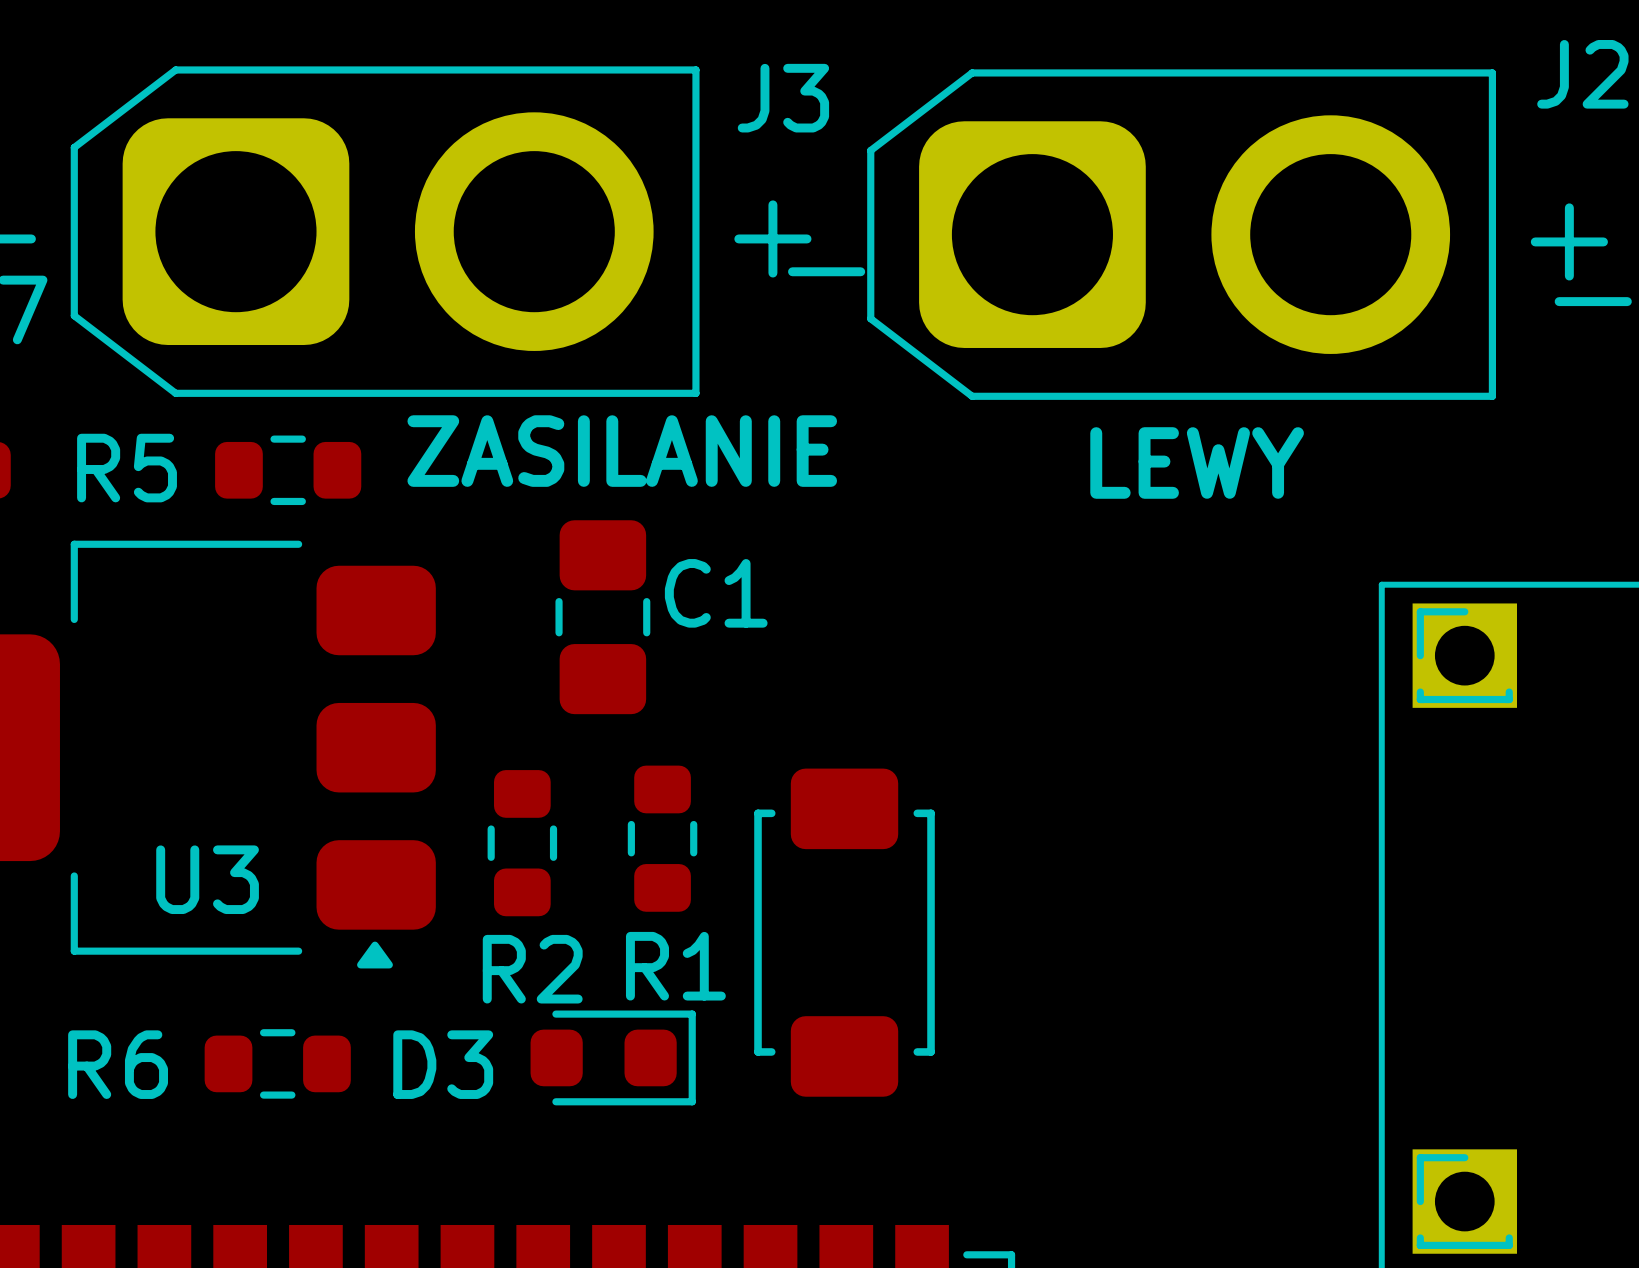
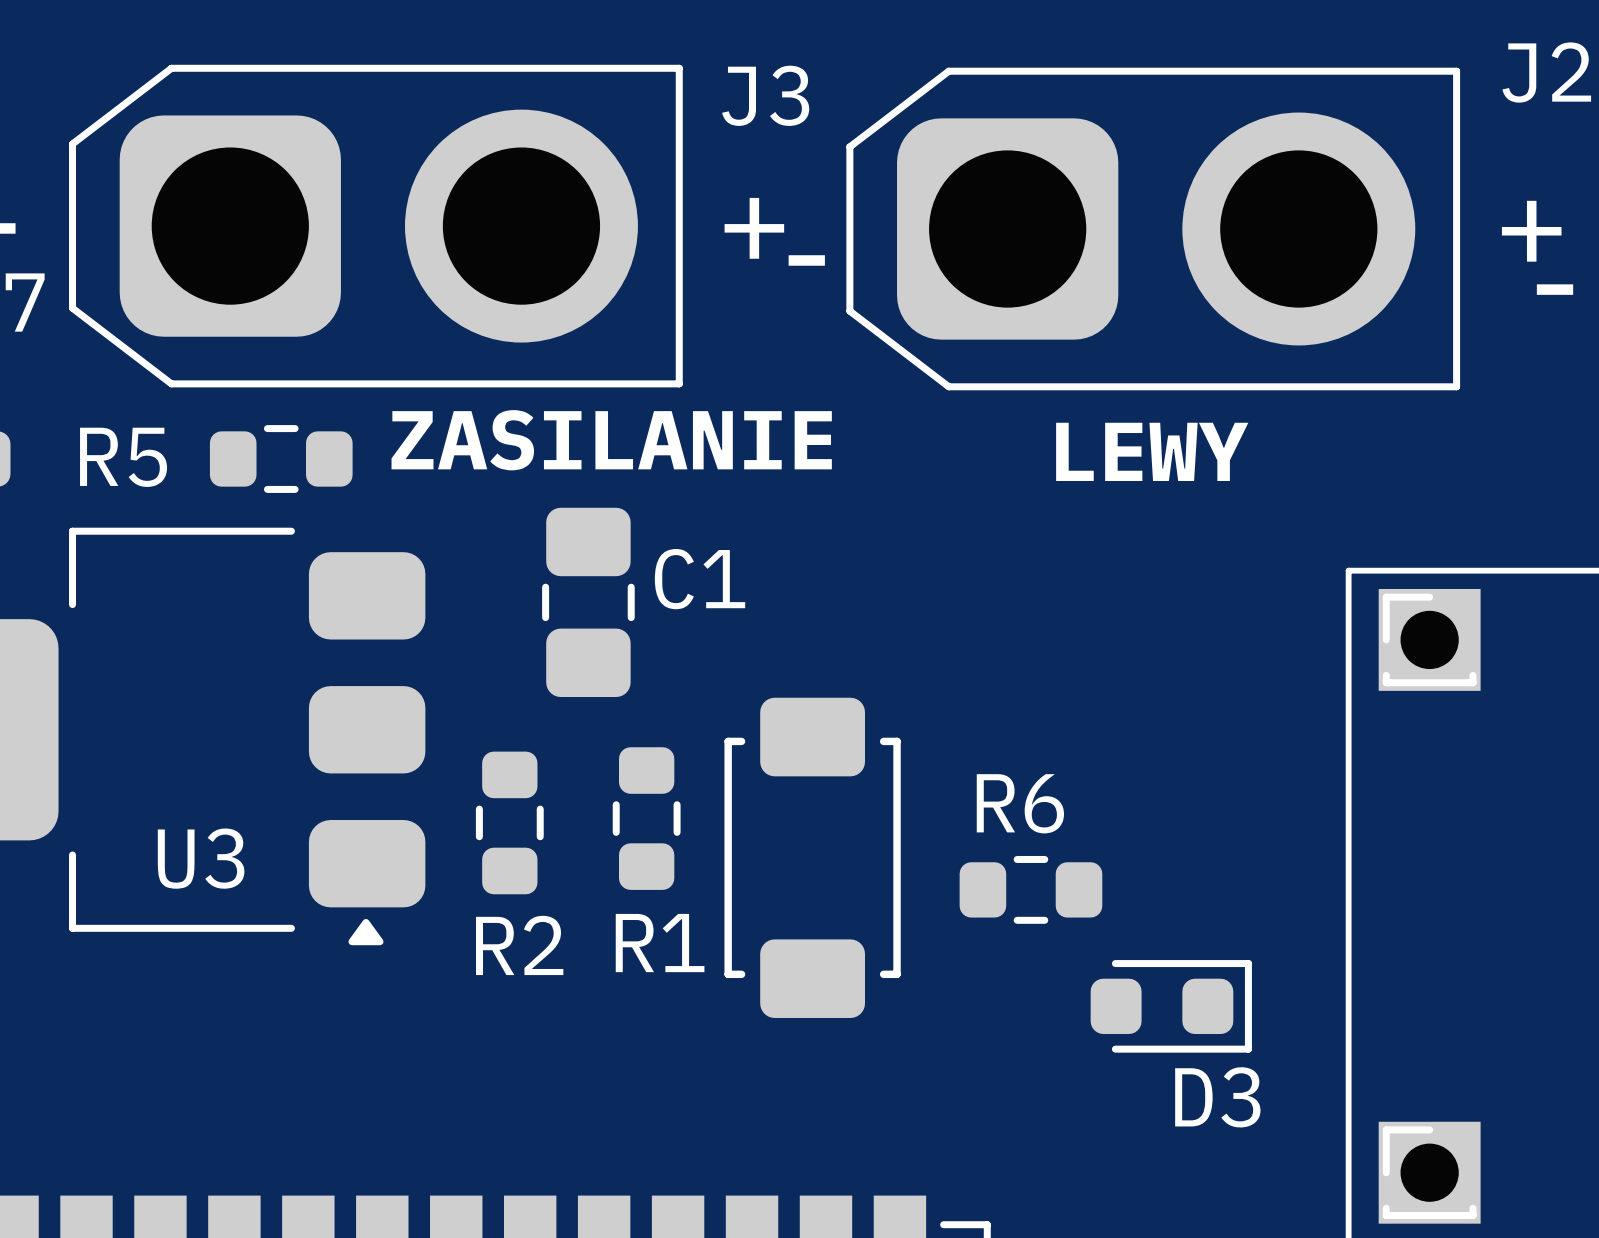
part position: (844, 932) -> (812, 857)
D3 position: (613, 1057) -> (1171, 1006)
R6 position: (277, 1063) -> (1030, 889)
R6 name position: R6 (118, 1064) -> R6 (1020, 803)
D3 name position: D3 (443, 1064) -> D3 (1217, 1097)

